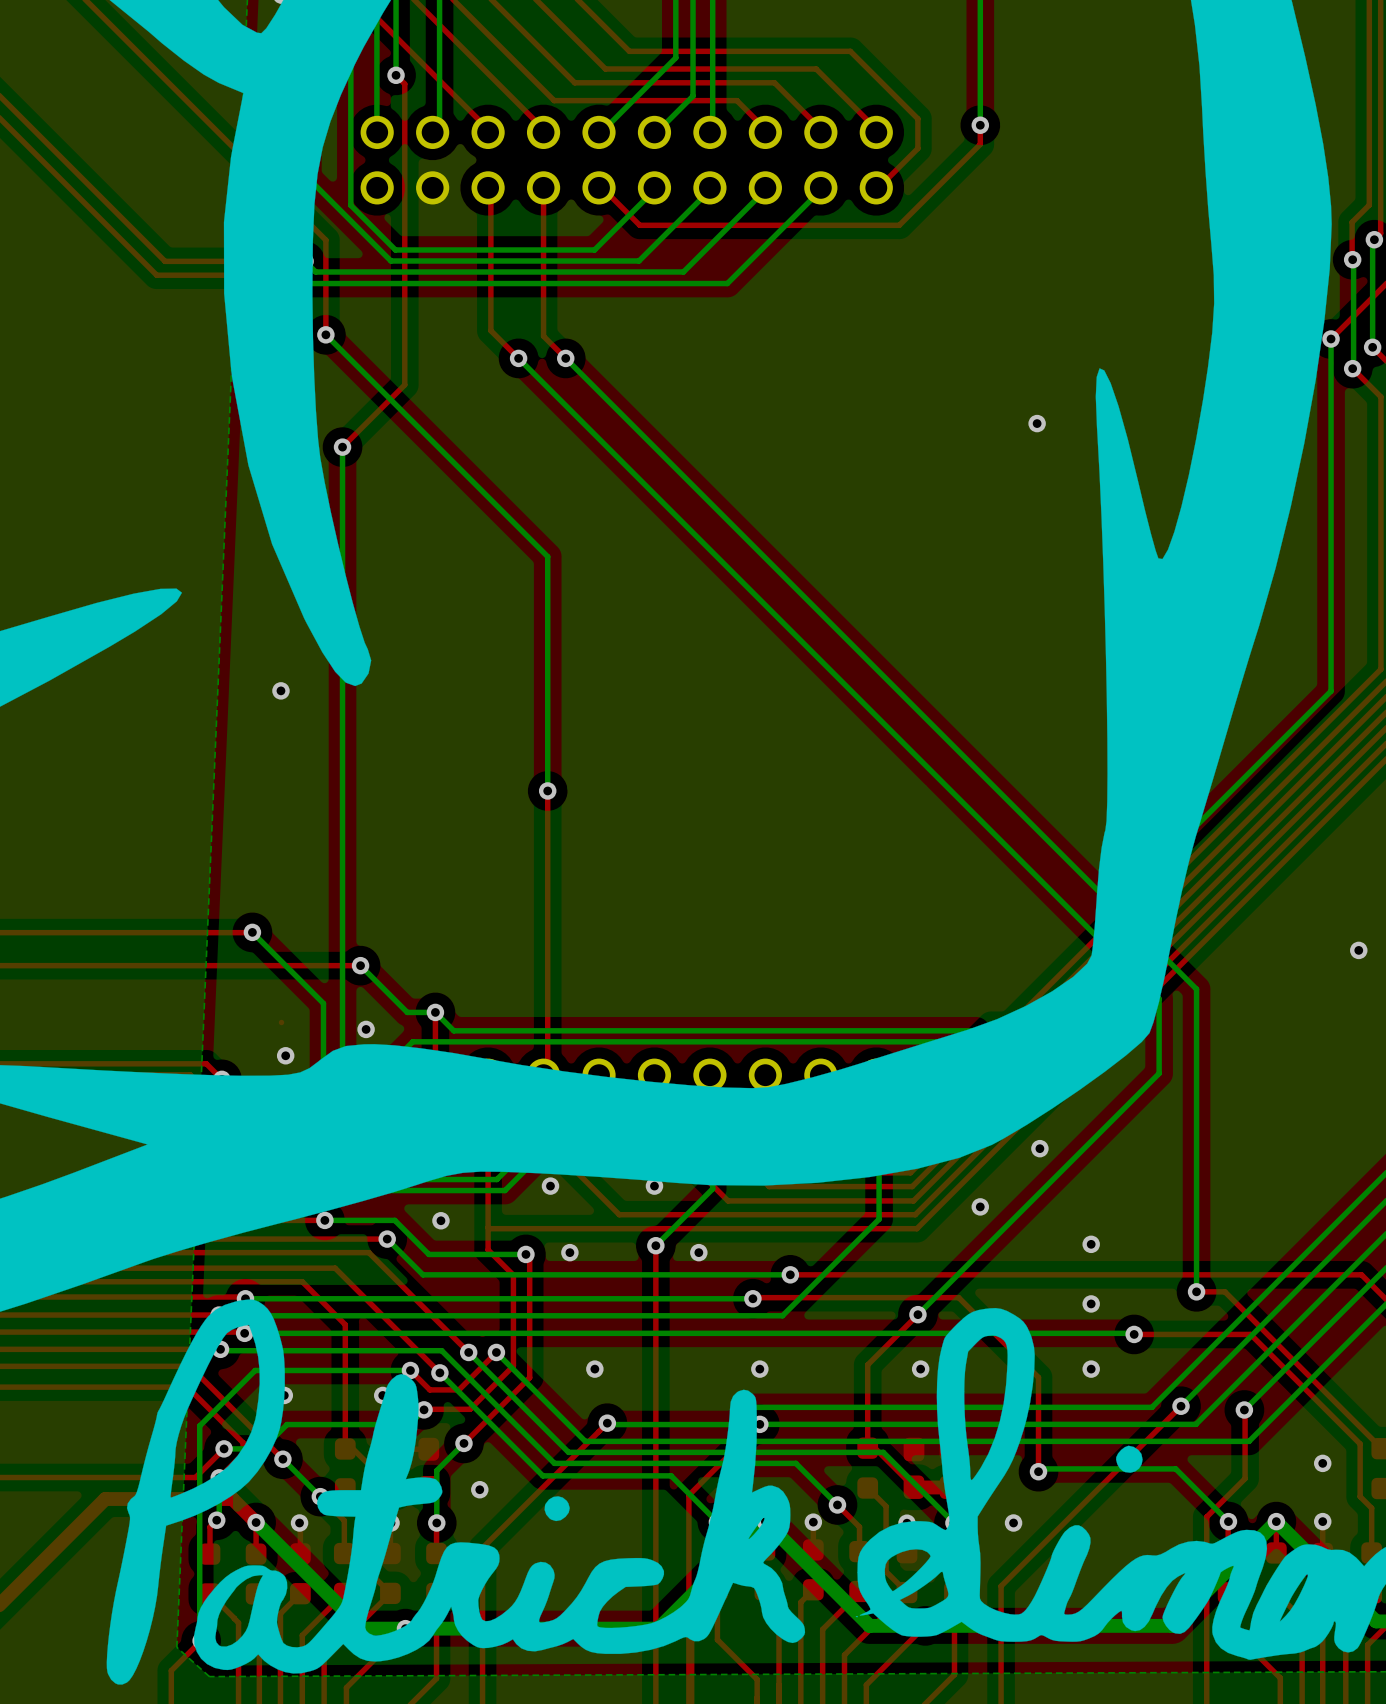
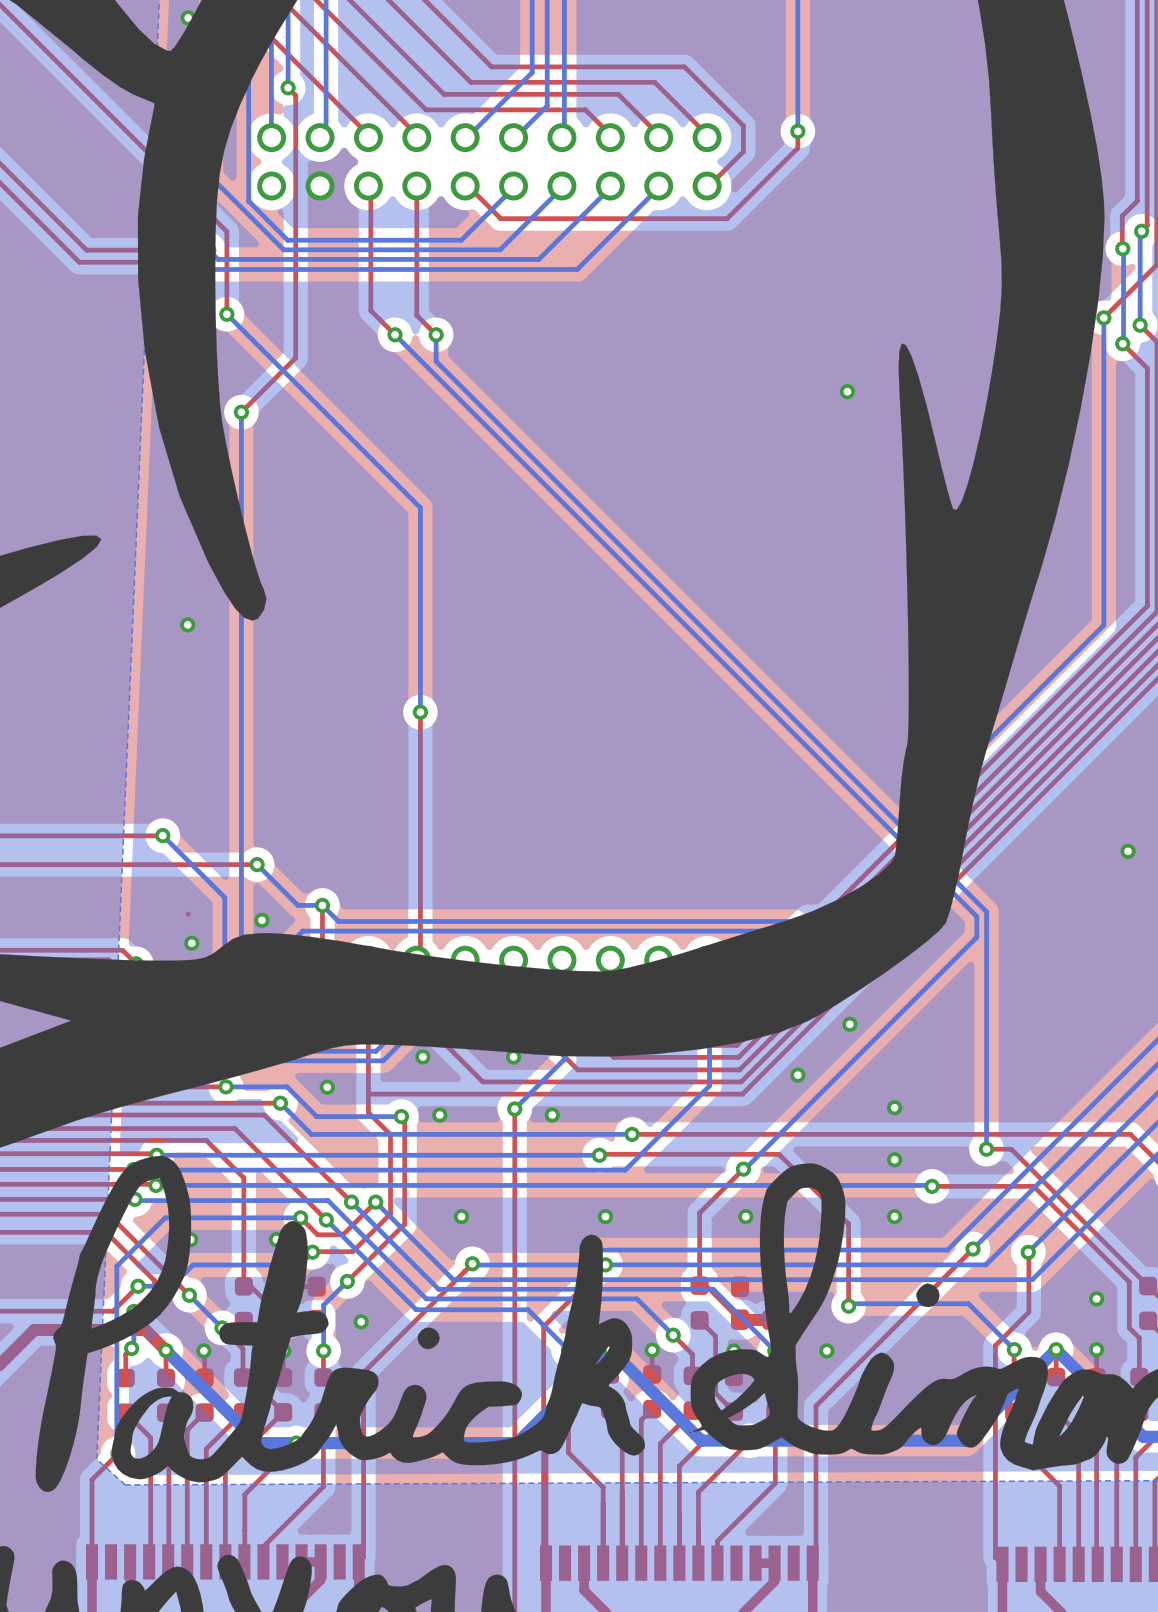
bottom track: (565, 358) (1196, 989) (1196, 1019) -> (436, 334) (436, 361) (986, 911)
bottom track: (1159, 998) (1159, 1073) (917, 1314) -> (953, 893) (976, 916) (976, 937) (743, 1169)

